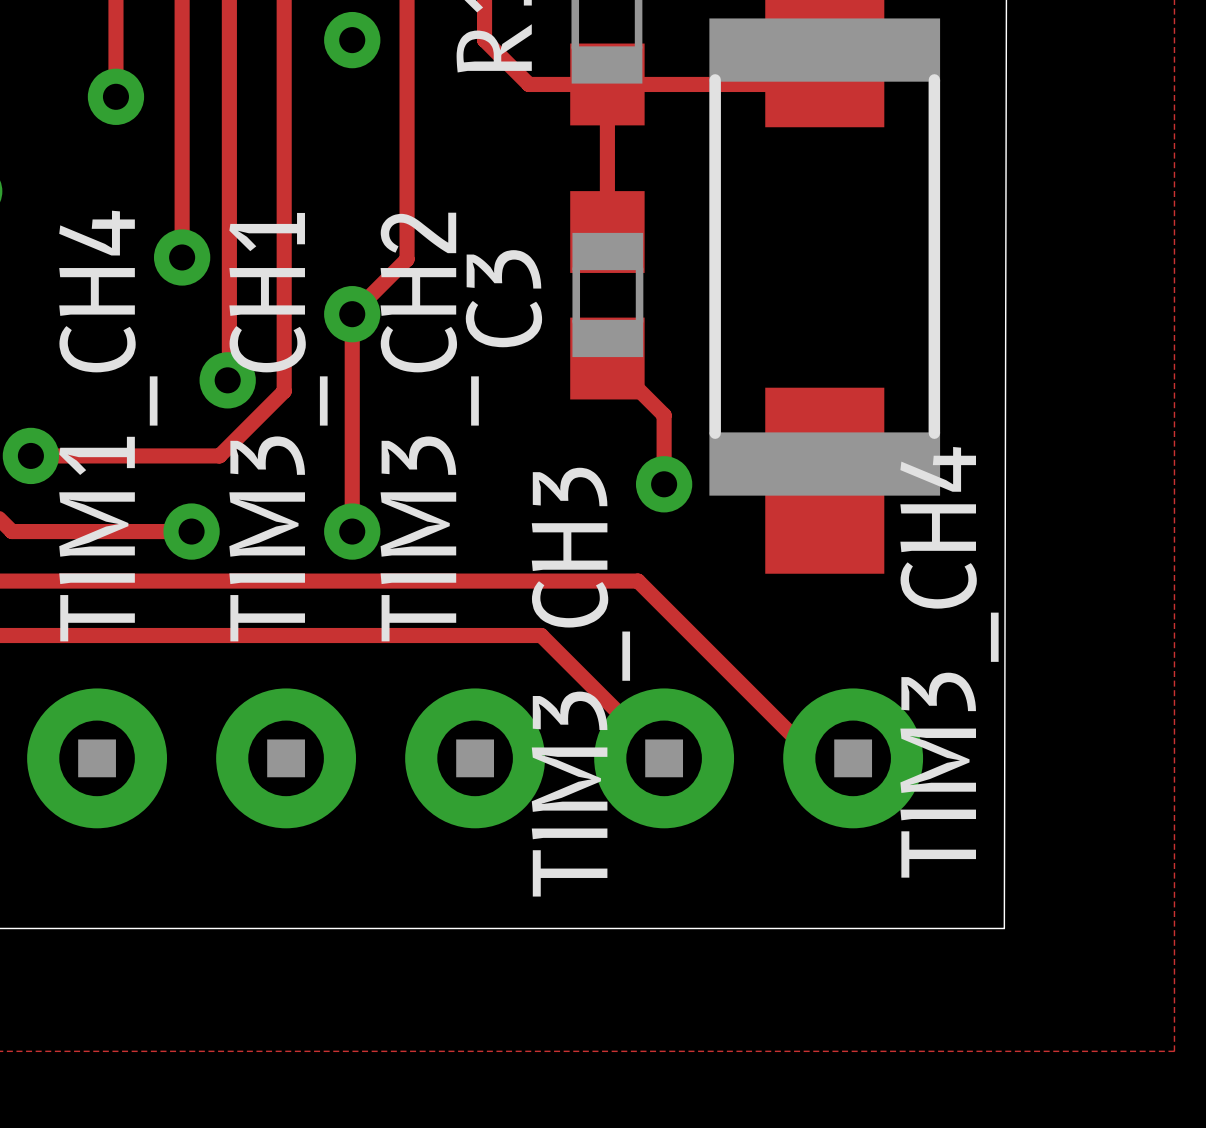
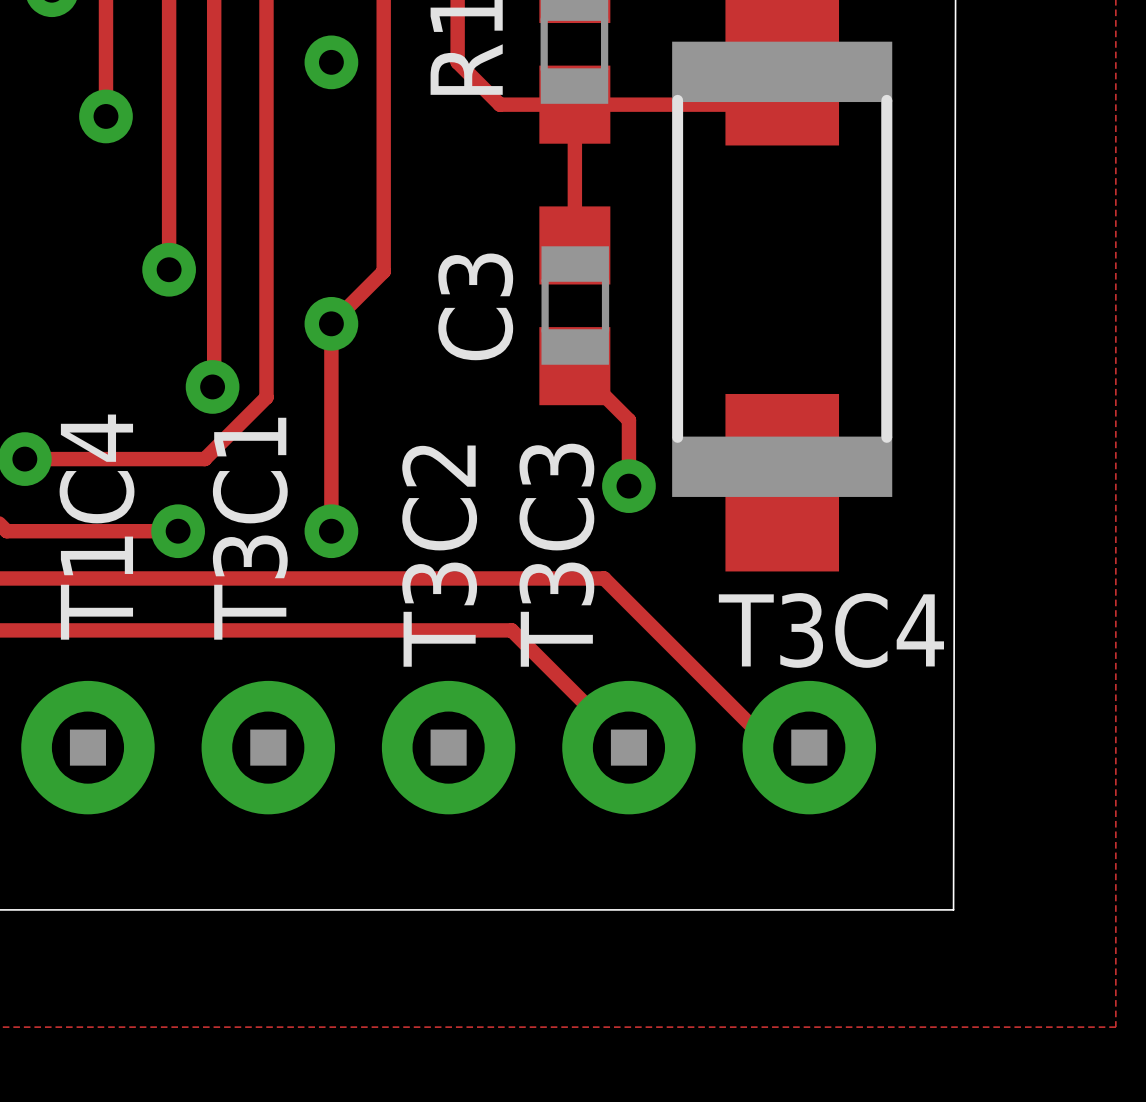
text: TIM1_CH4 (108, 426) -> T1C4 (97, 527)
text: TIM3_CH1 (278, 427) -> T3C1 (250, 528)
text: TIM3_CH2 (429, 427) -> T3C2 (439, 556)
text: TIM3_CH4 (949, 662) -> T3C4 (831, 630)
text: TIM3_CH3 (580, 682) -> T3C3 (556, 555)

